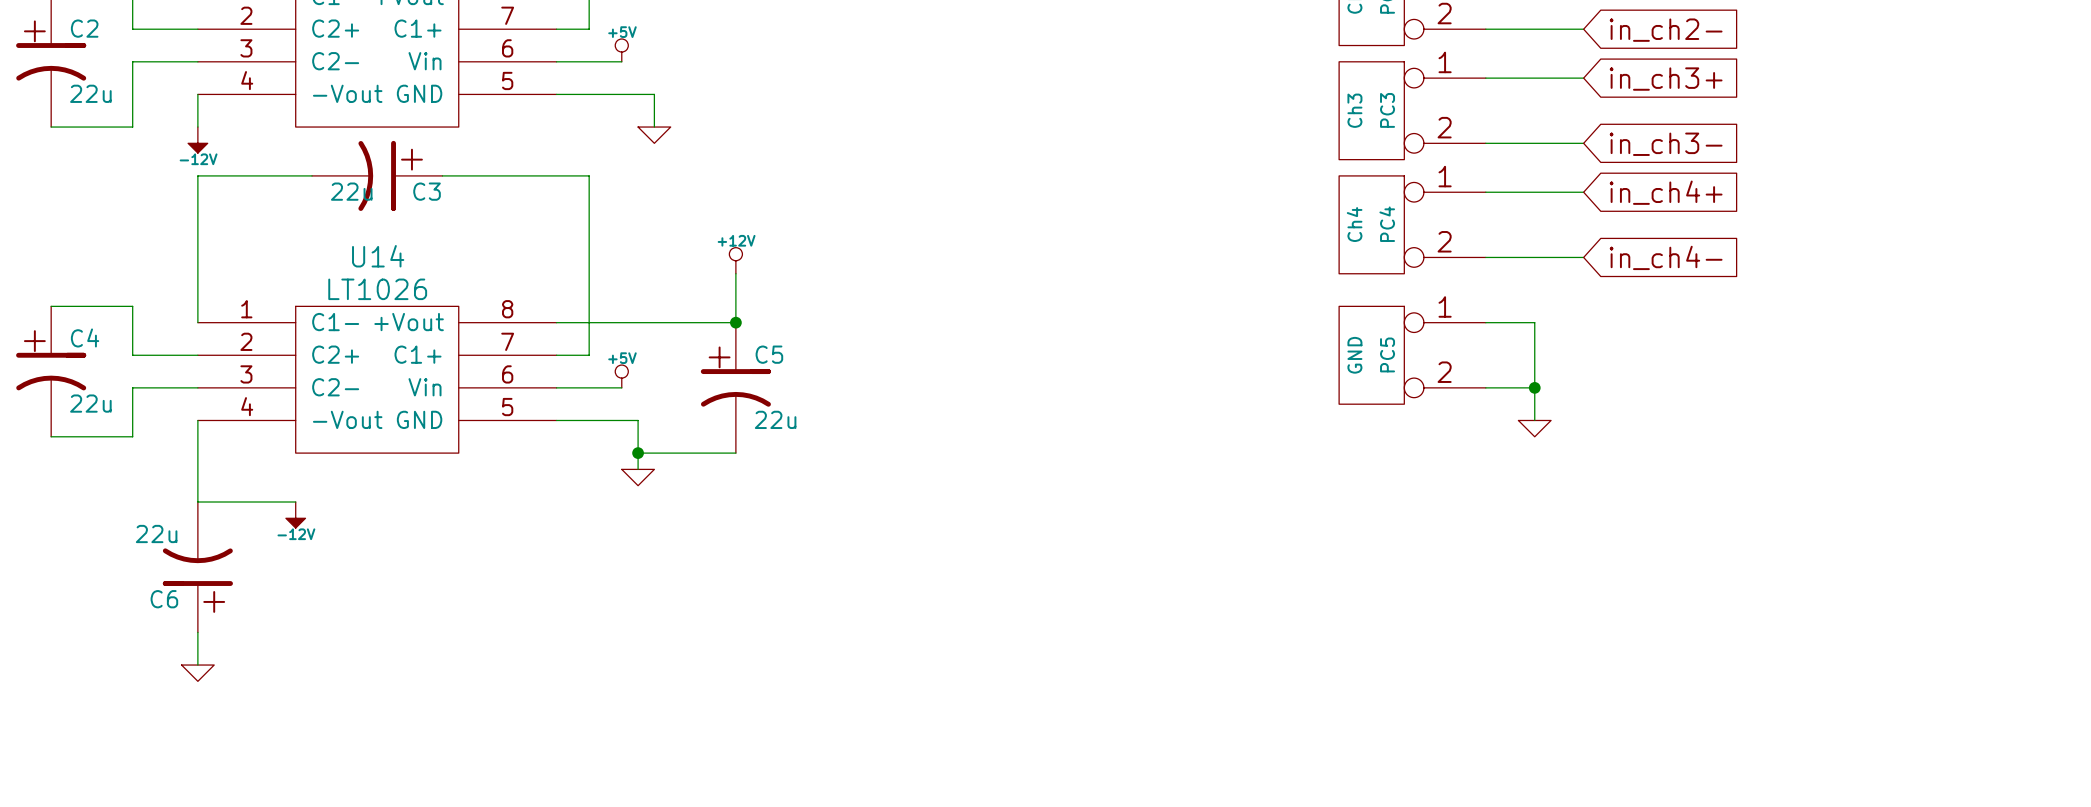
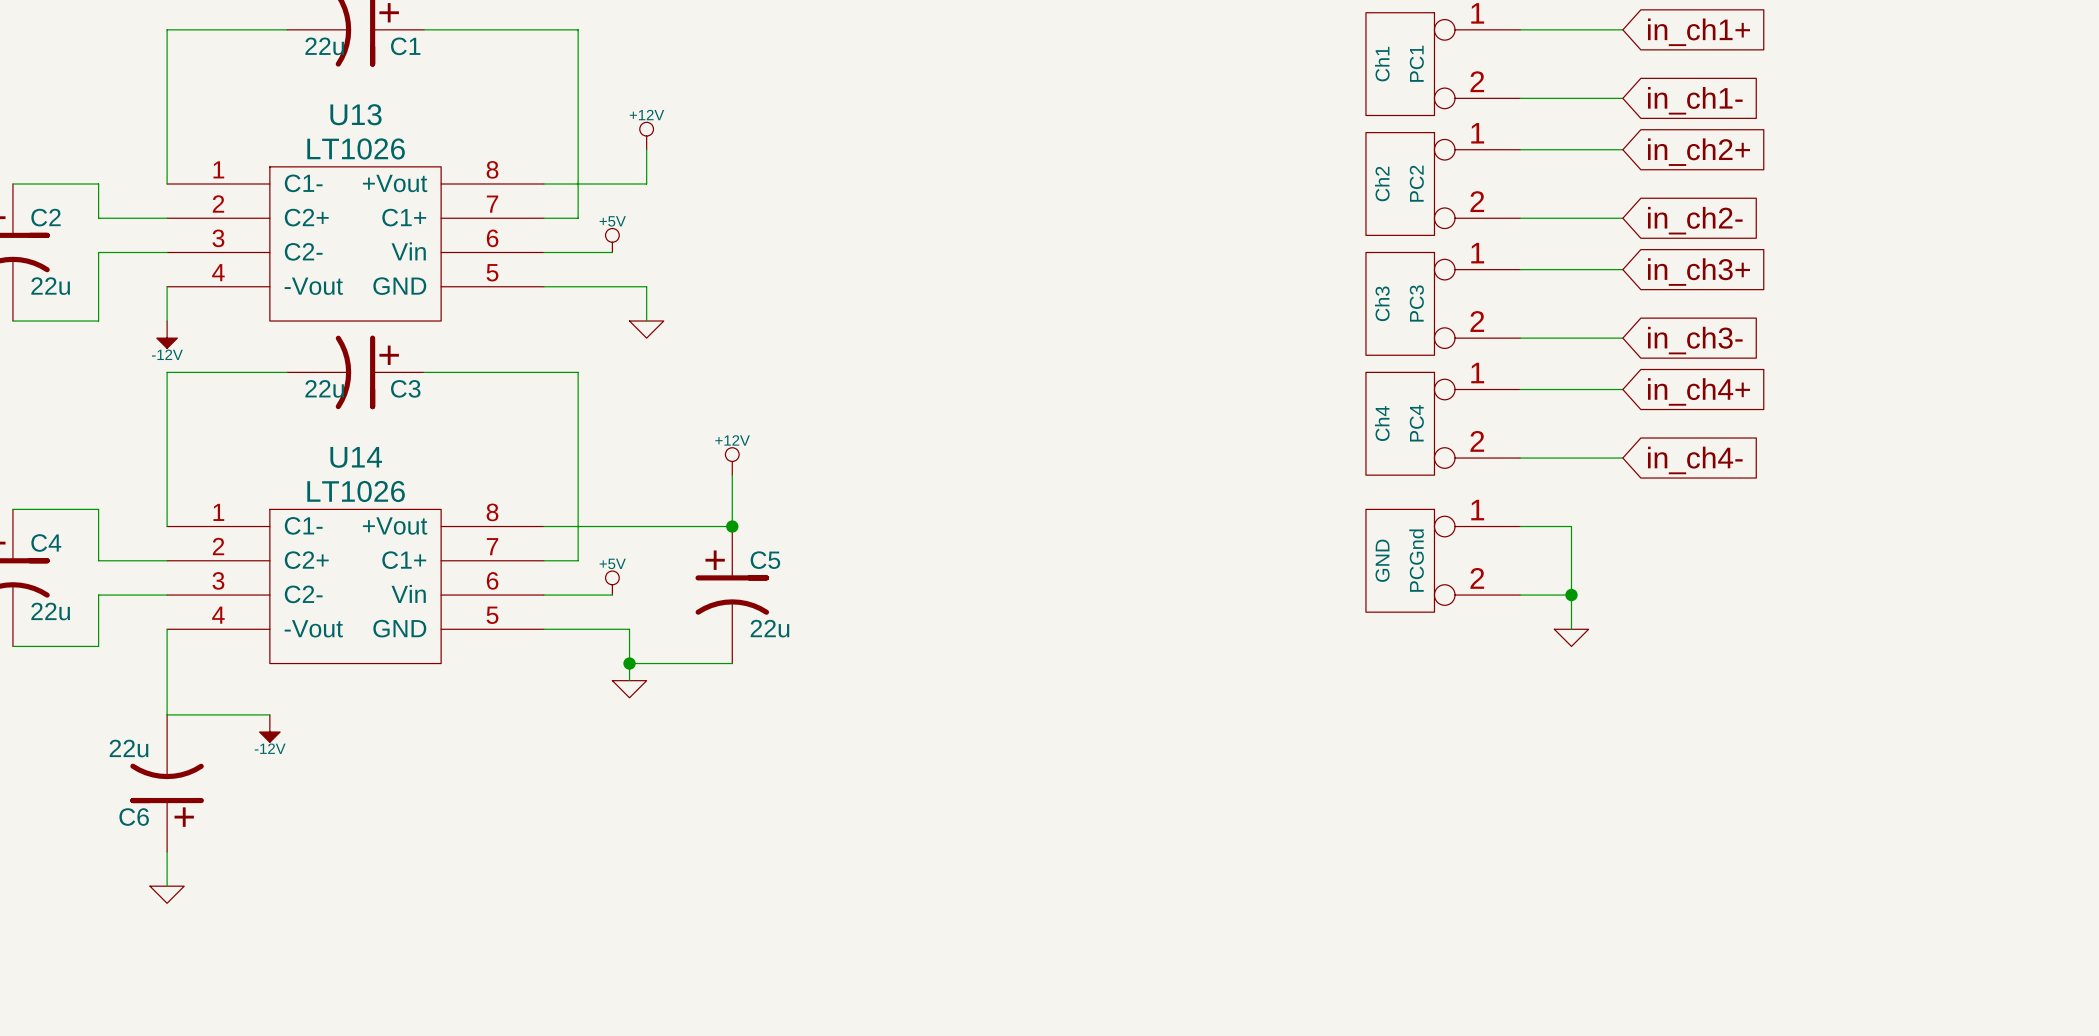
PC5 name: PC5 (1387, 354) -> PCGnd (1416, 560)

